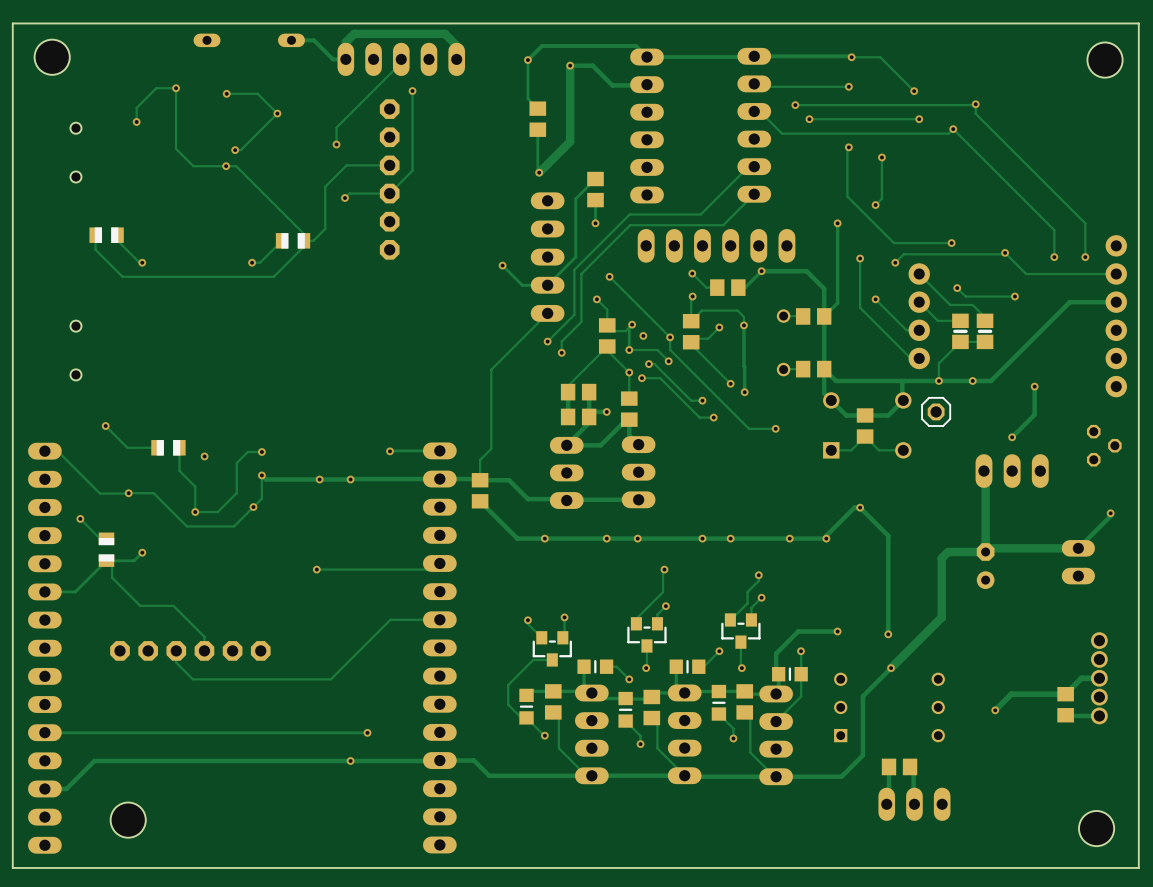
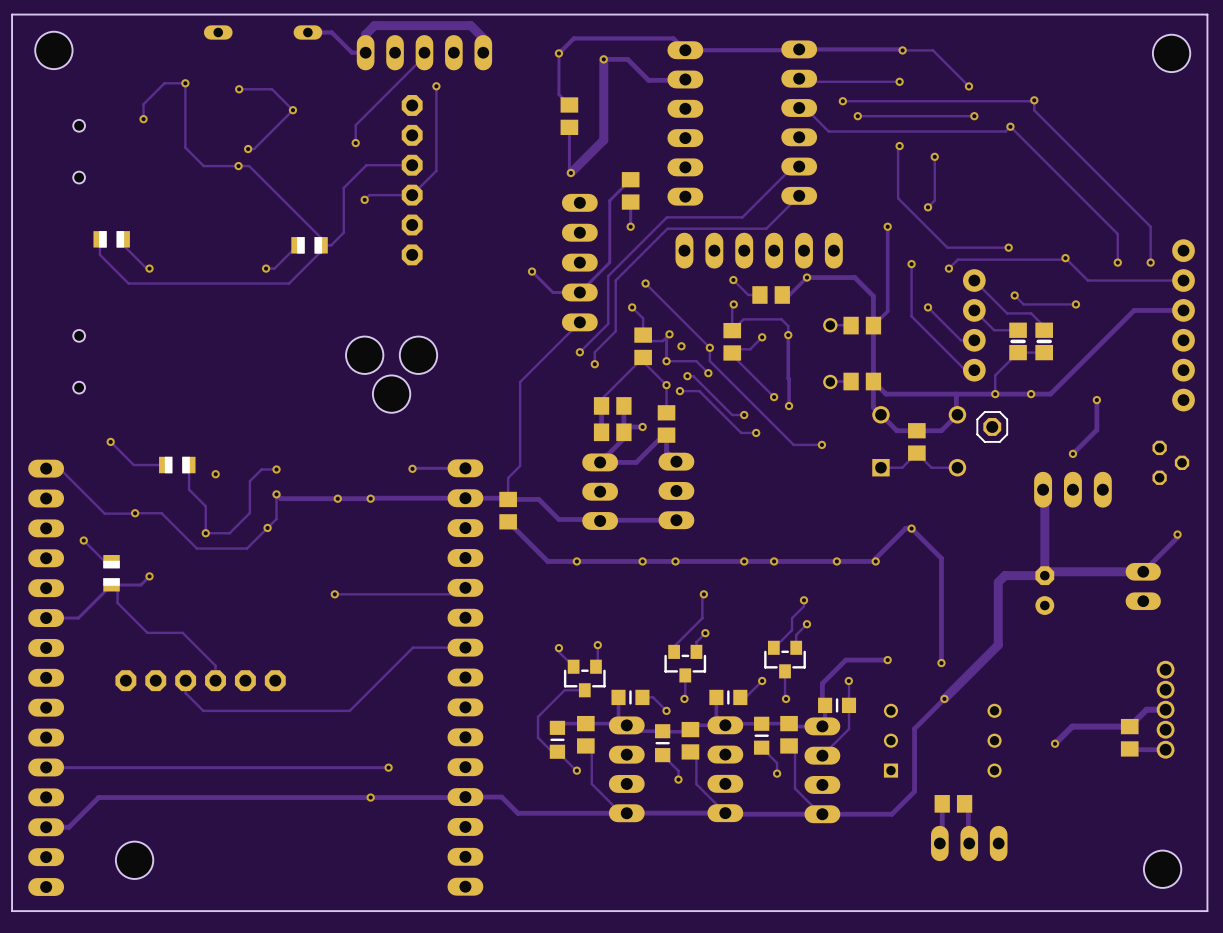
hole: none -> (364, 355)
hole: none -> (418, 355)
hole: none -> (391, 394)

